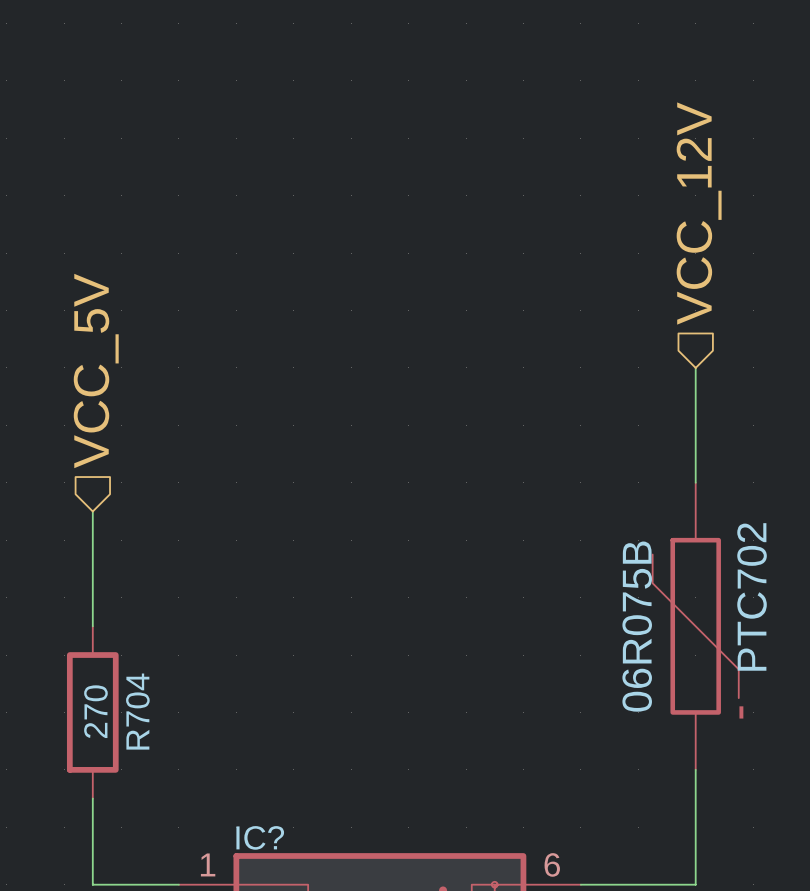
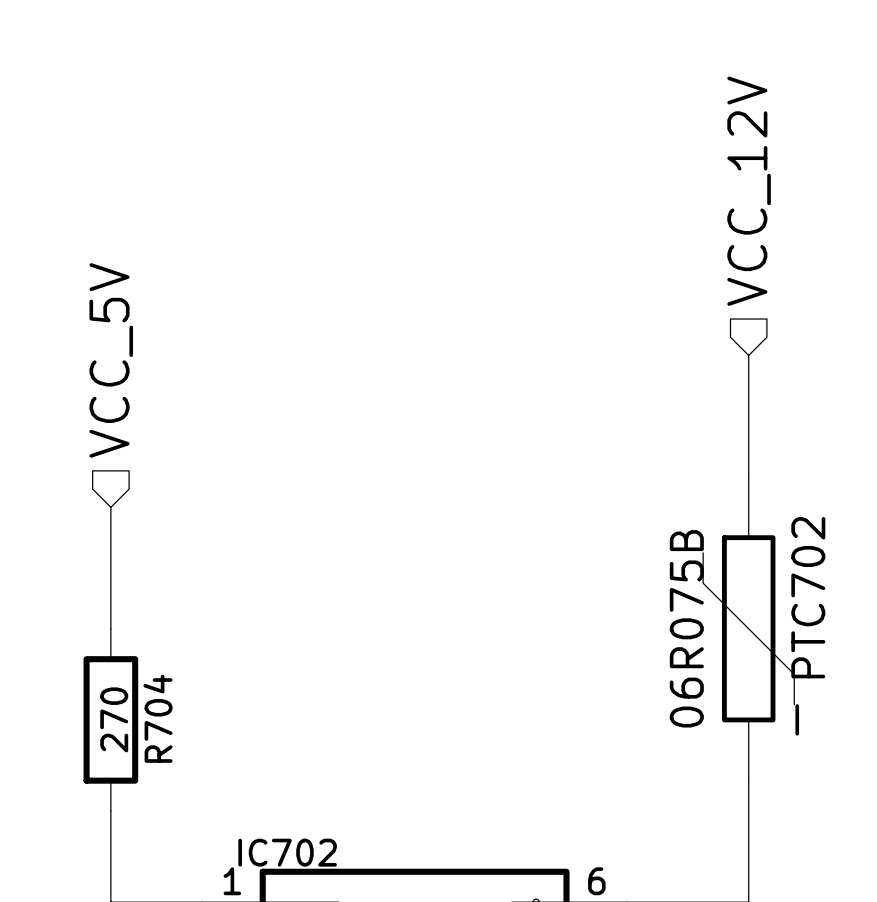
IC? name: IC? (260, 837) -> IC702 (287, 852)

